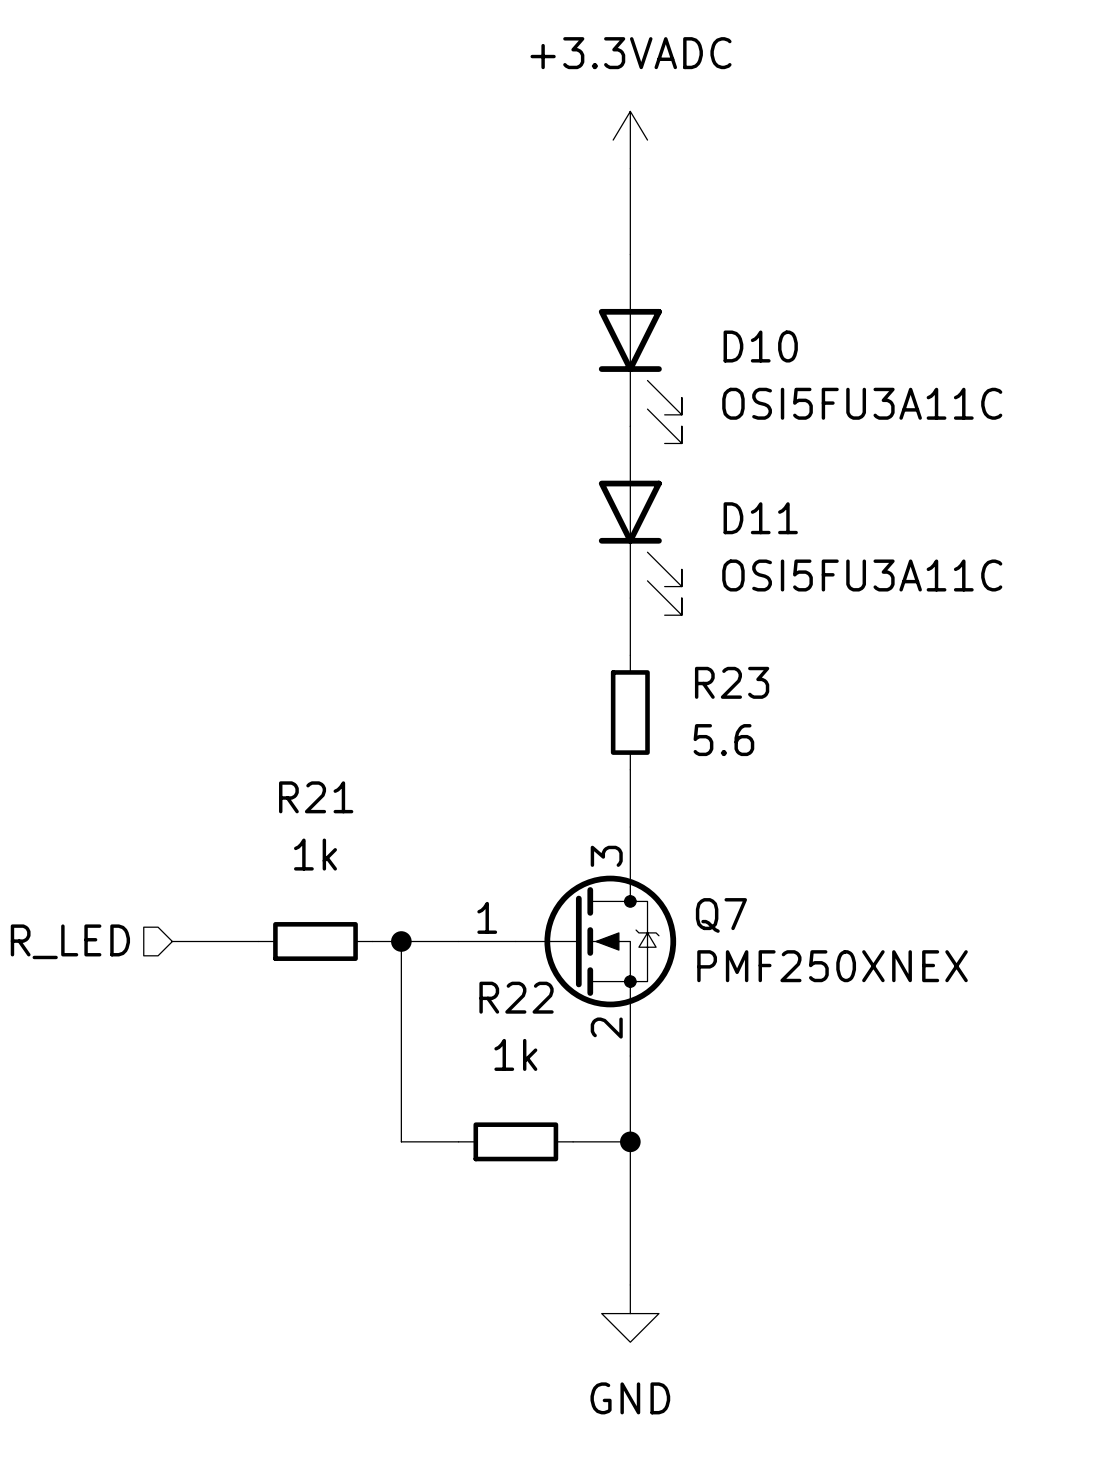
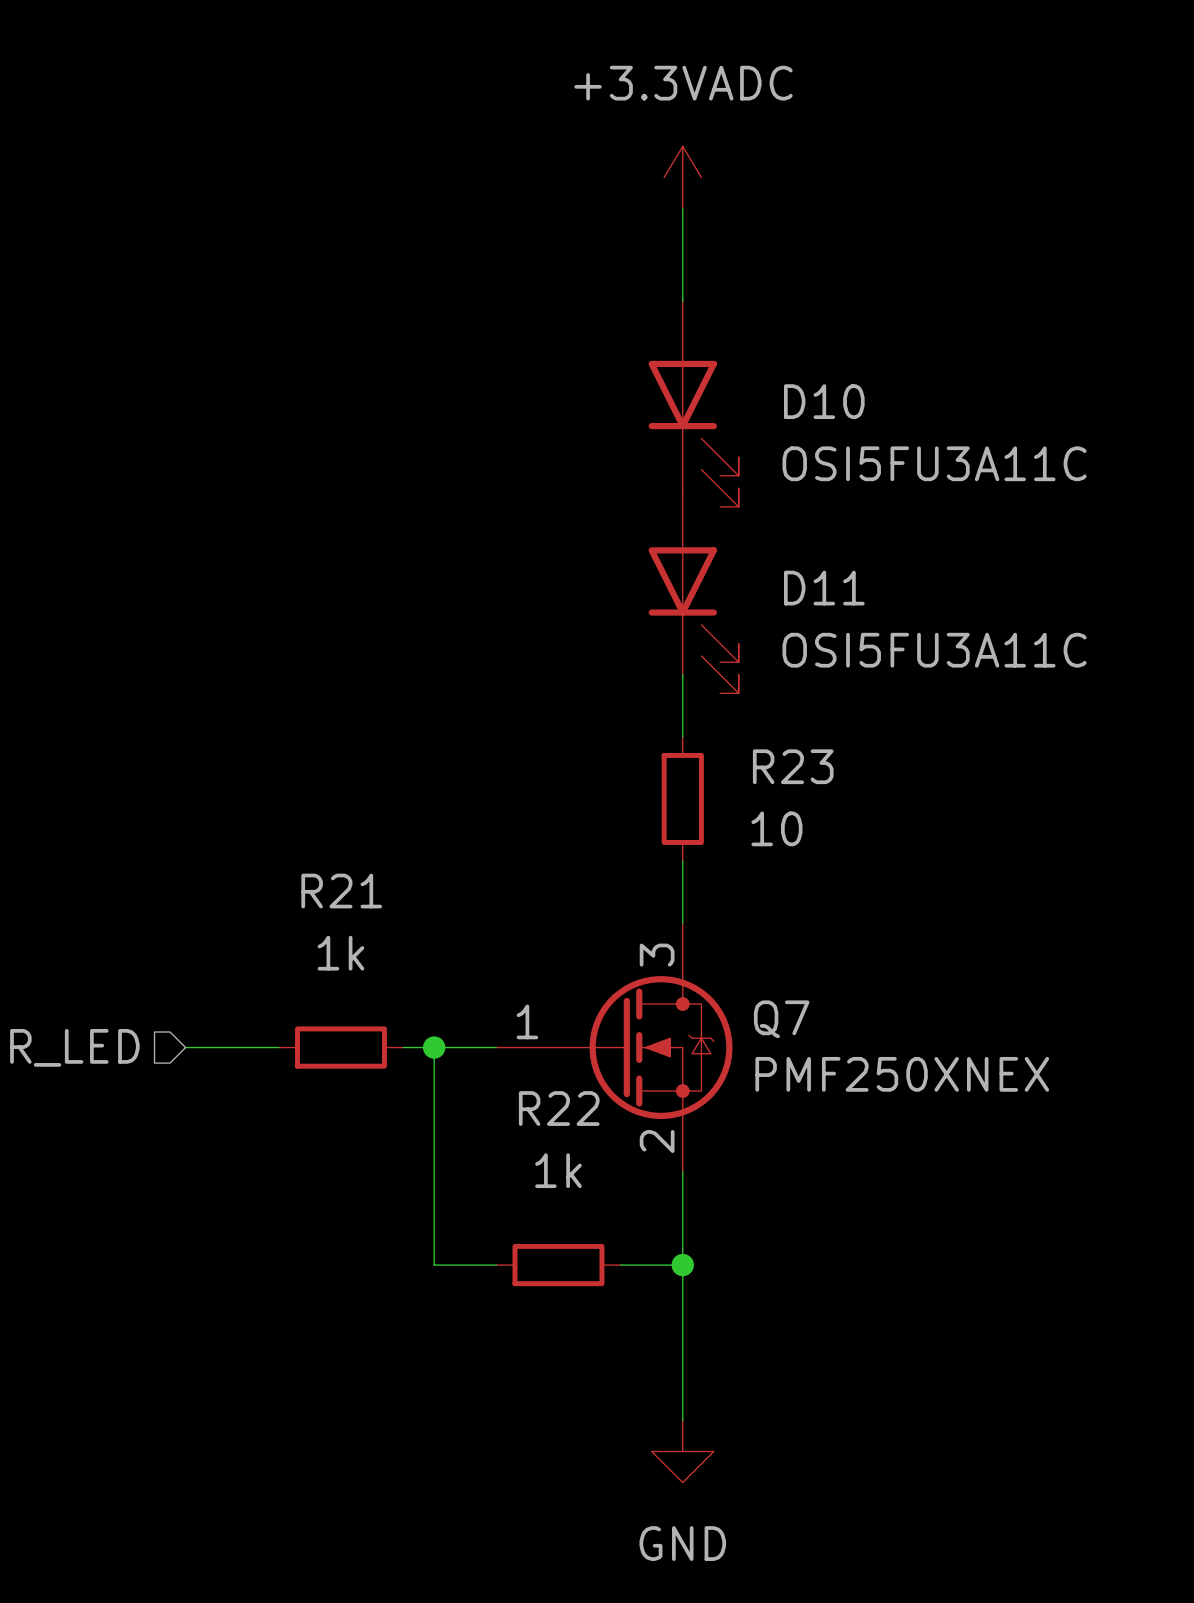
R23 value: 5.6 (723, 740) -> 10 (776, 828)

